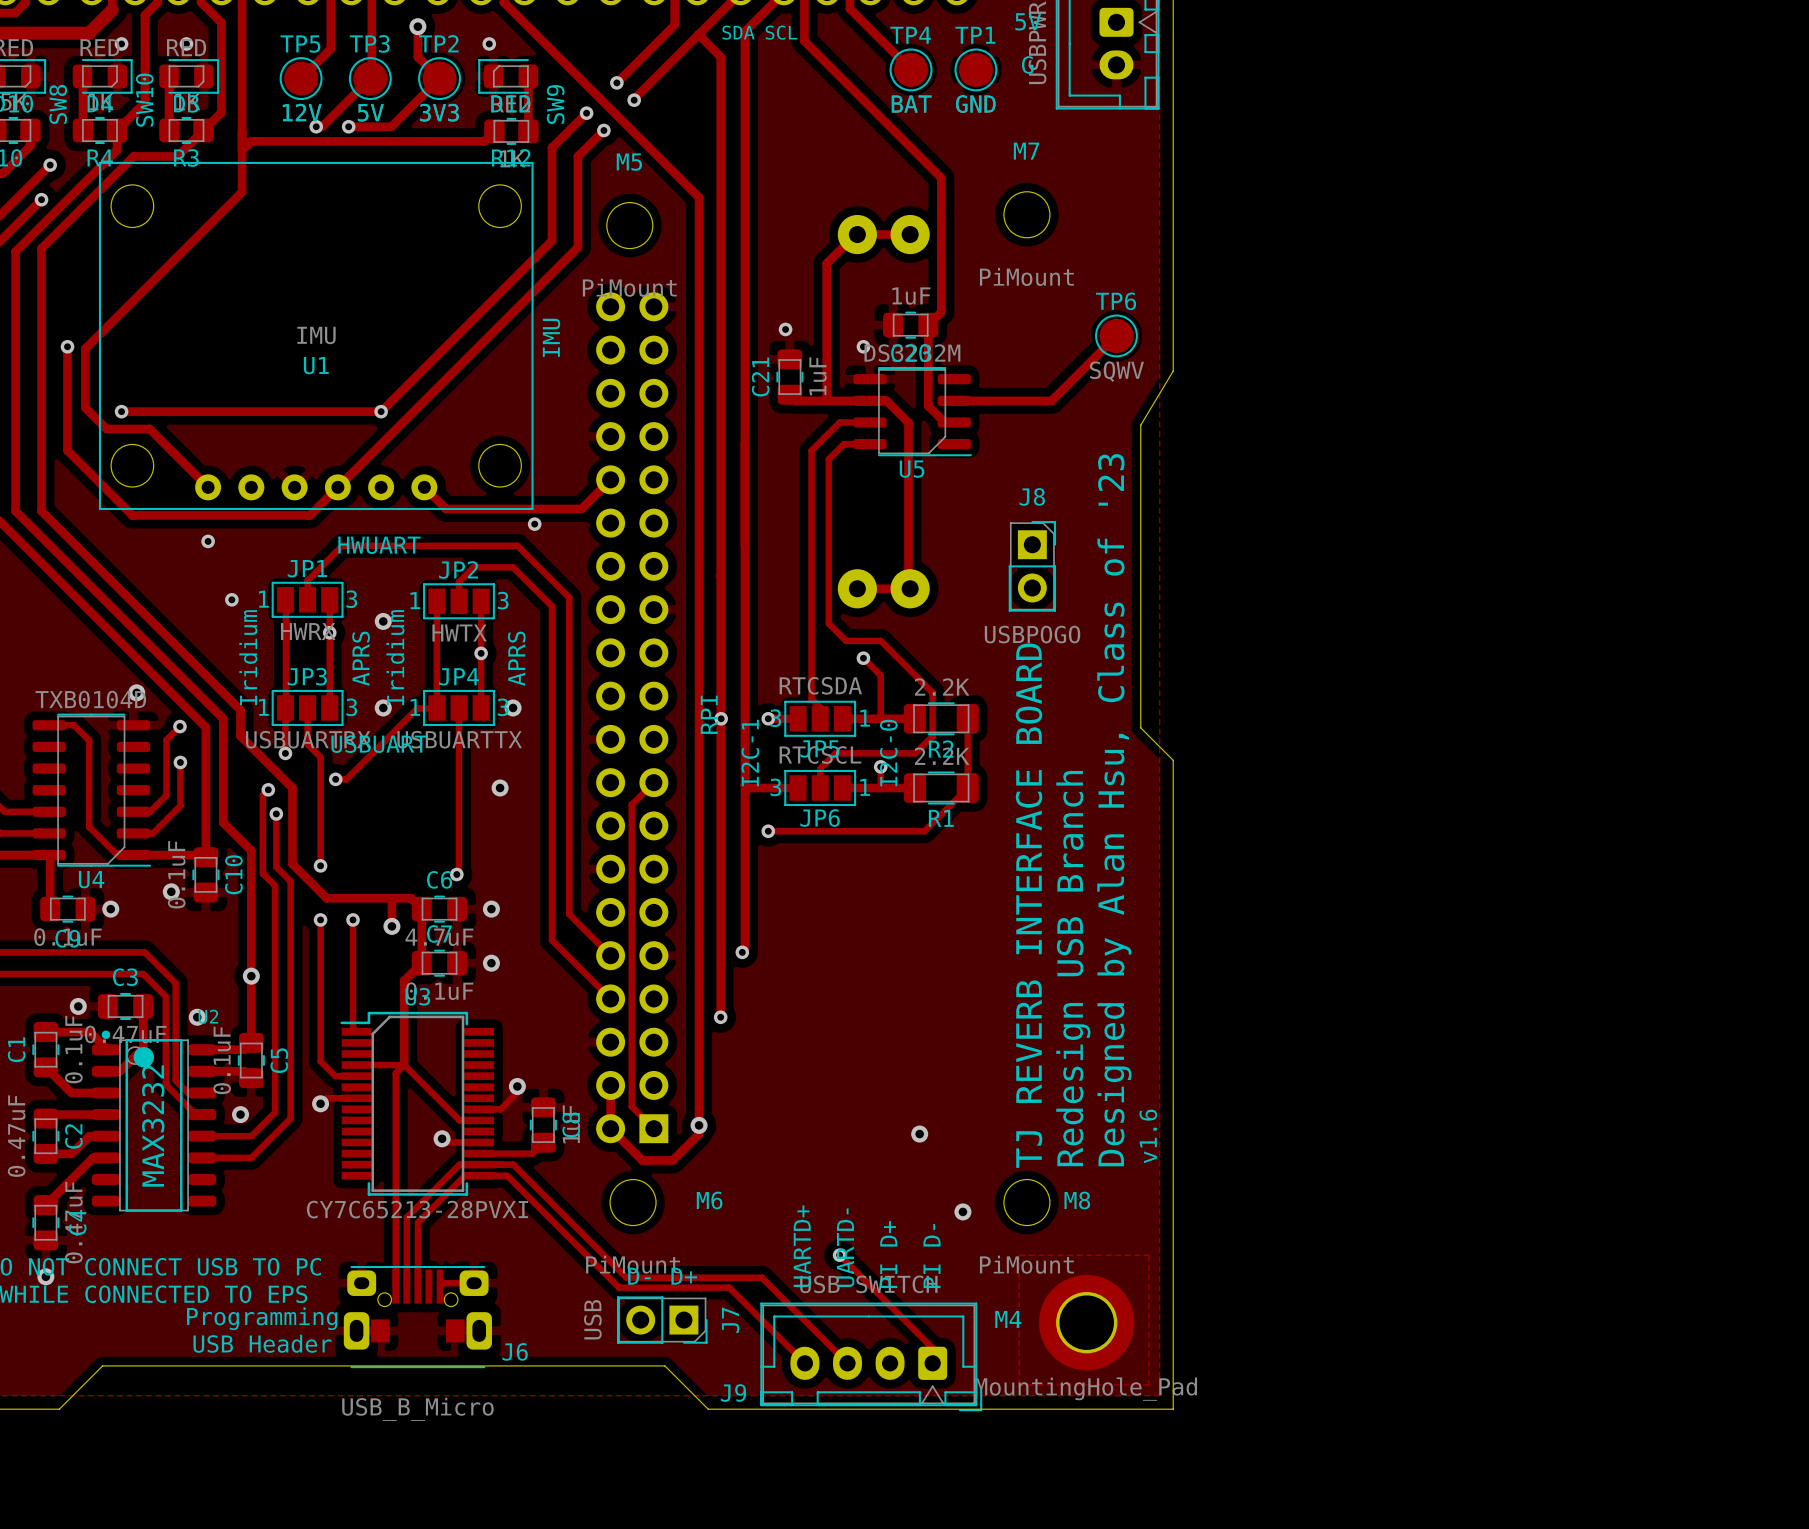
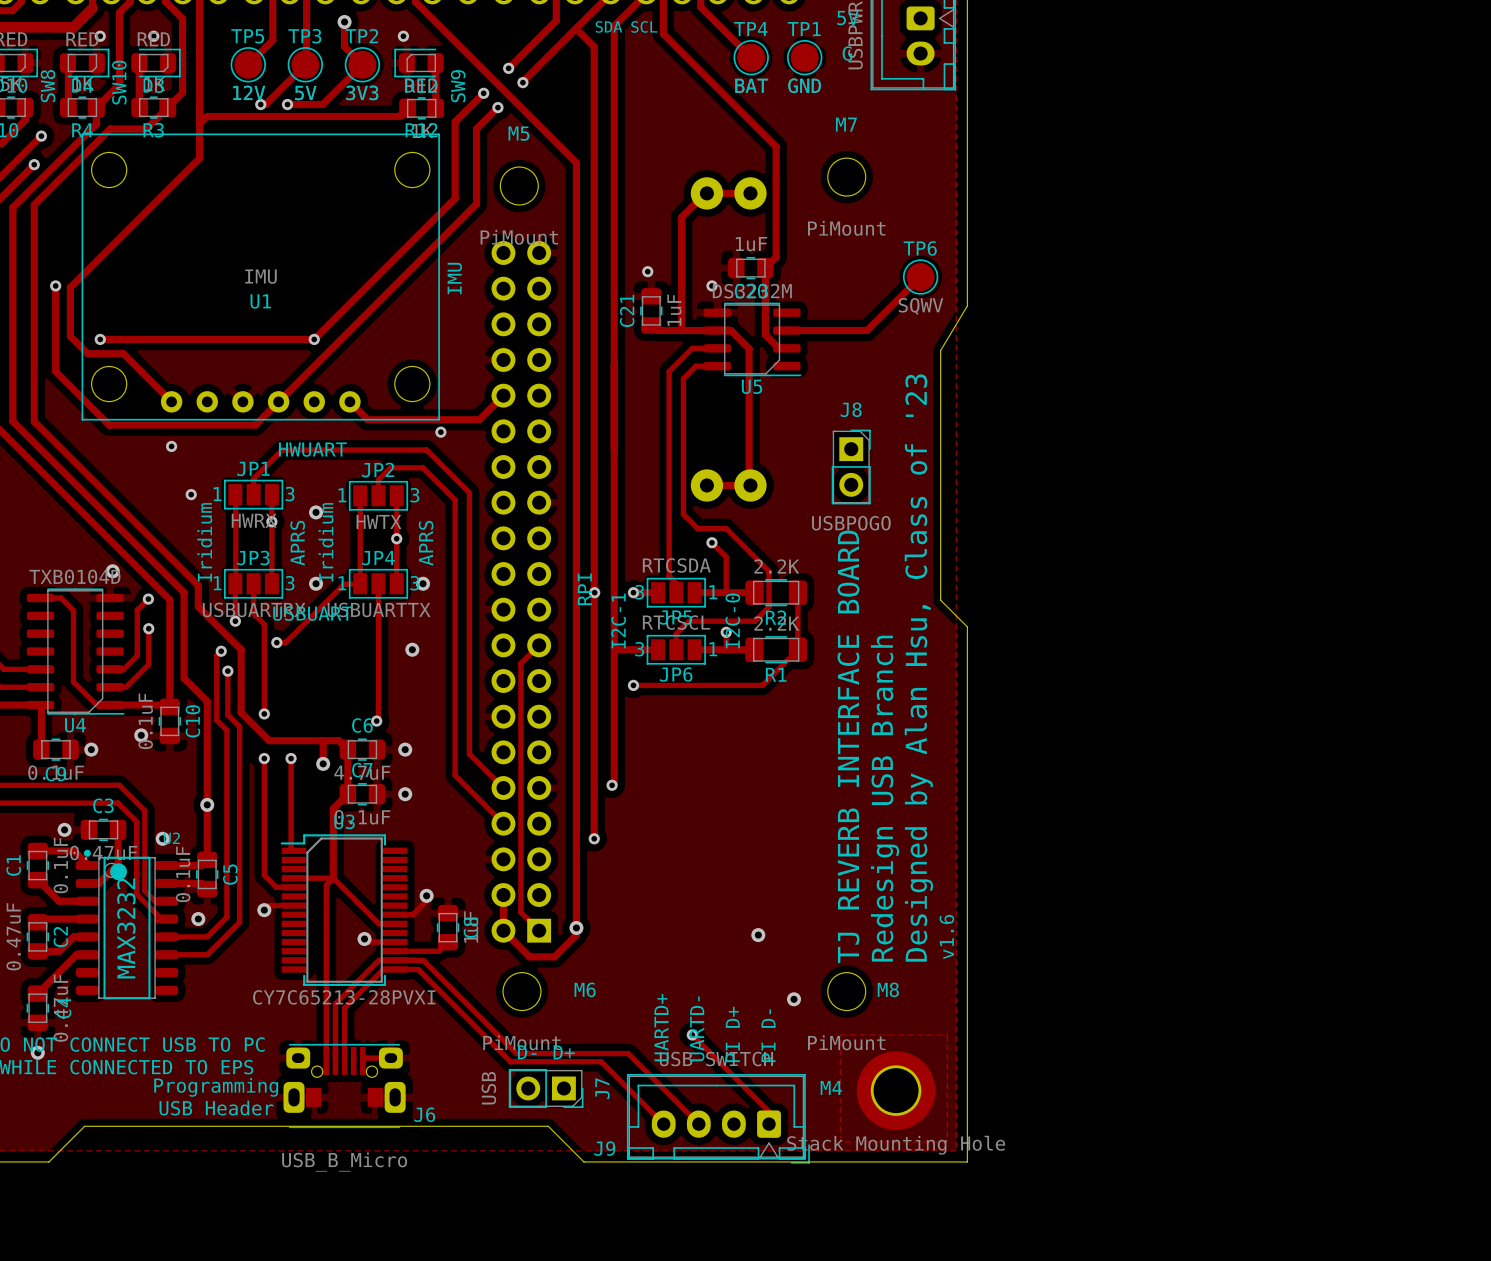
M4 value: MountingHole_Pad (1086, 1389) -> Stack Mounting Hole (896, 1145)

